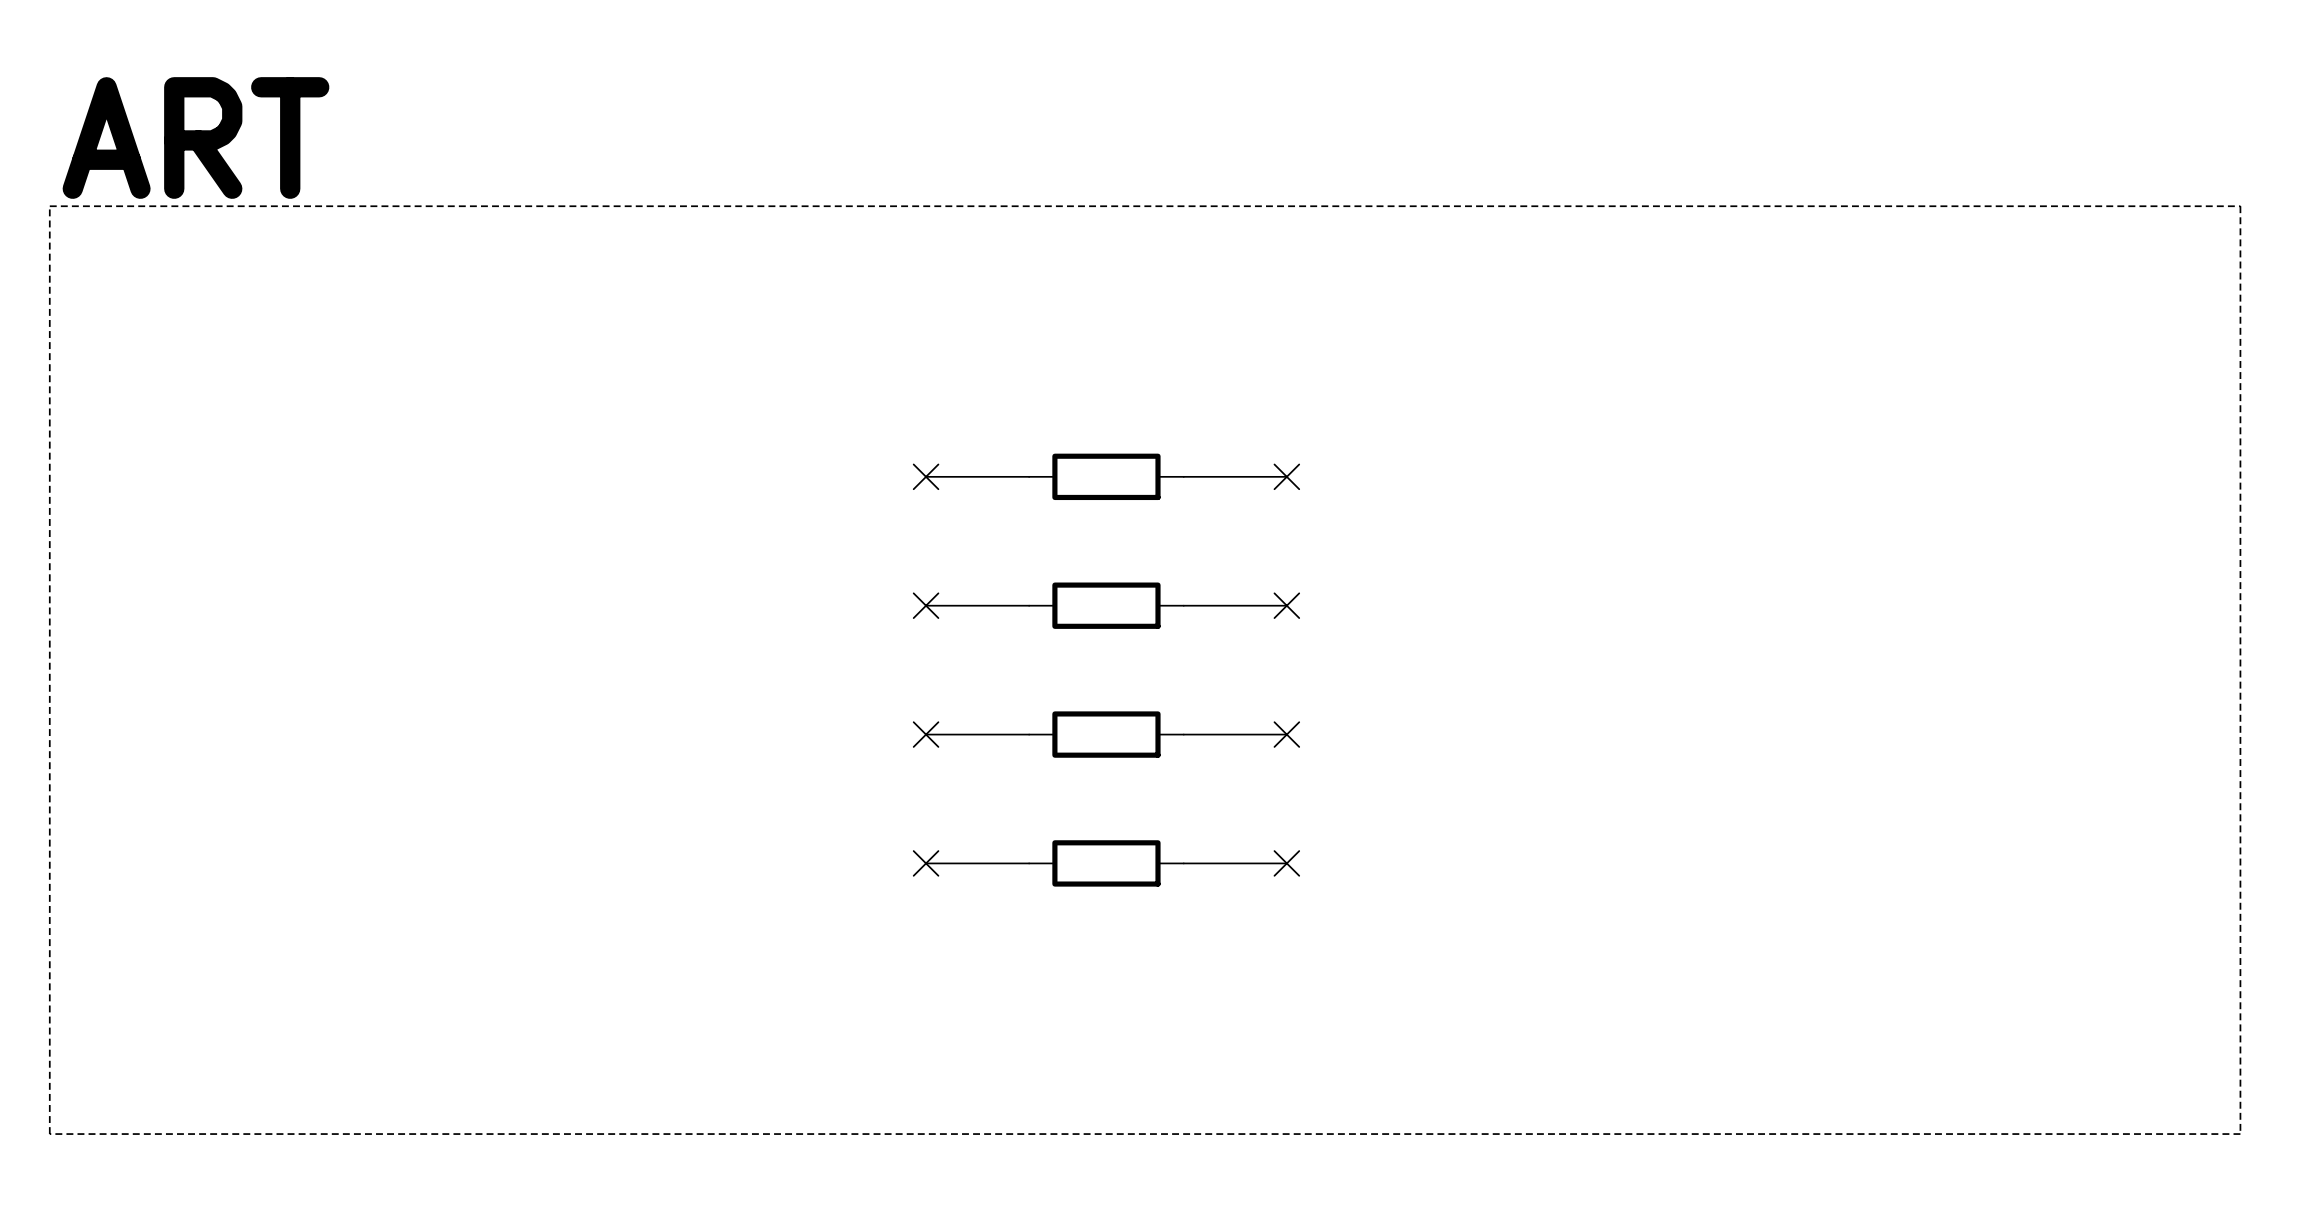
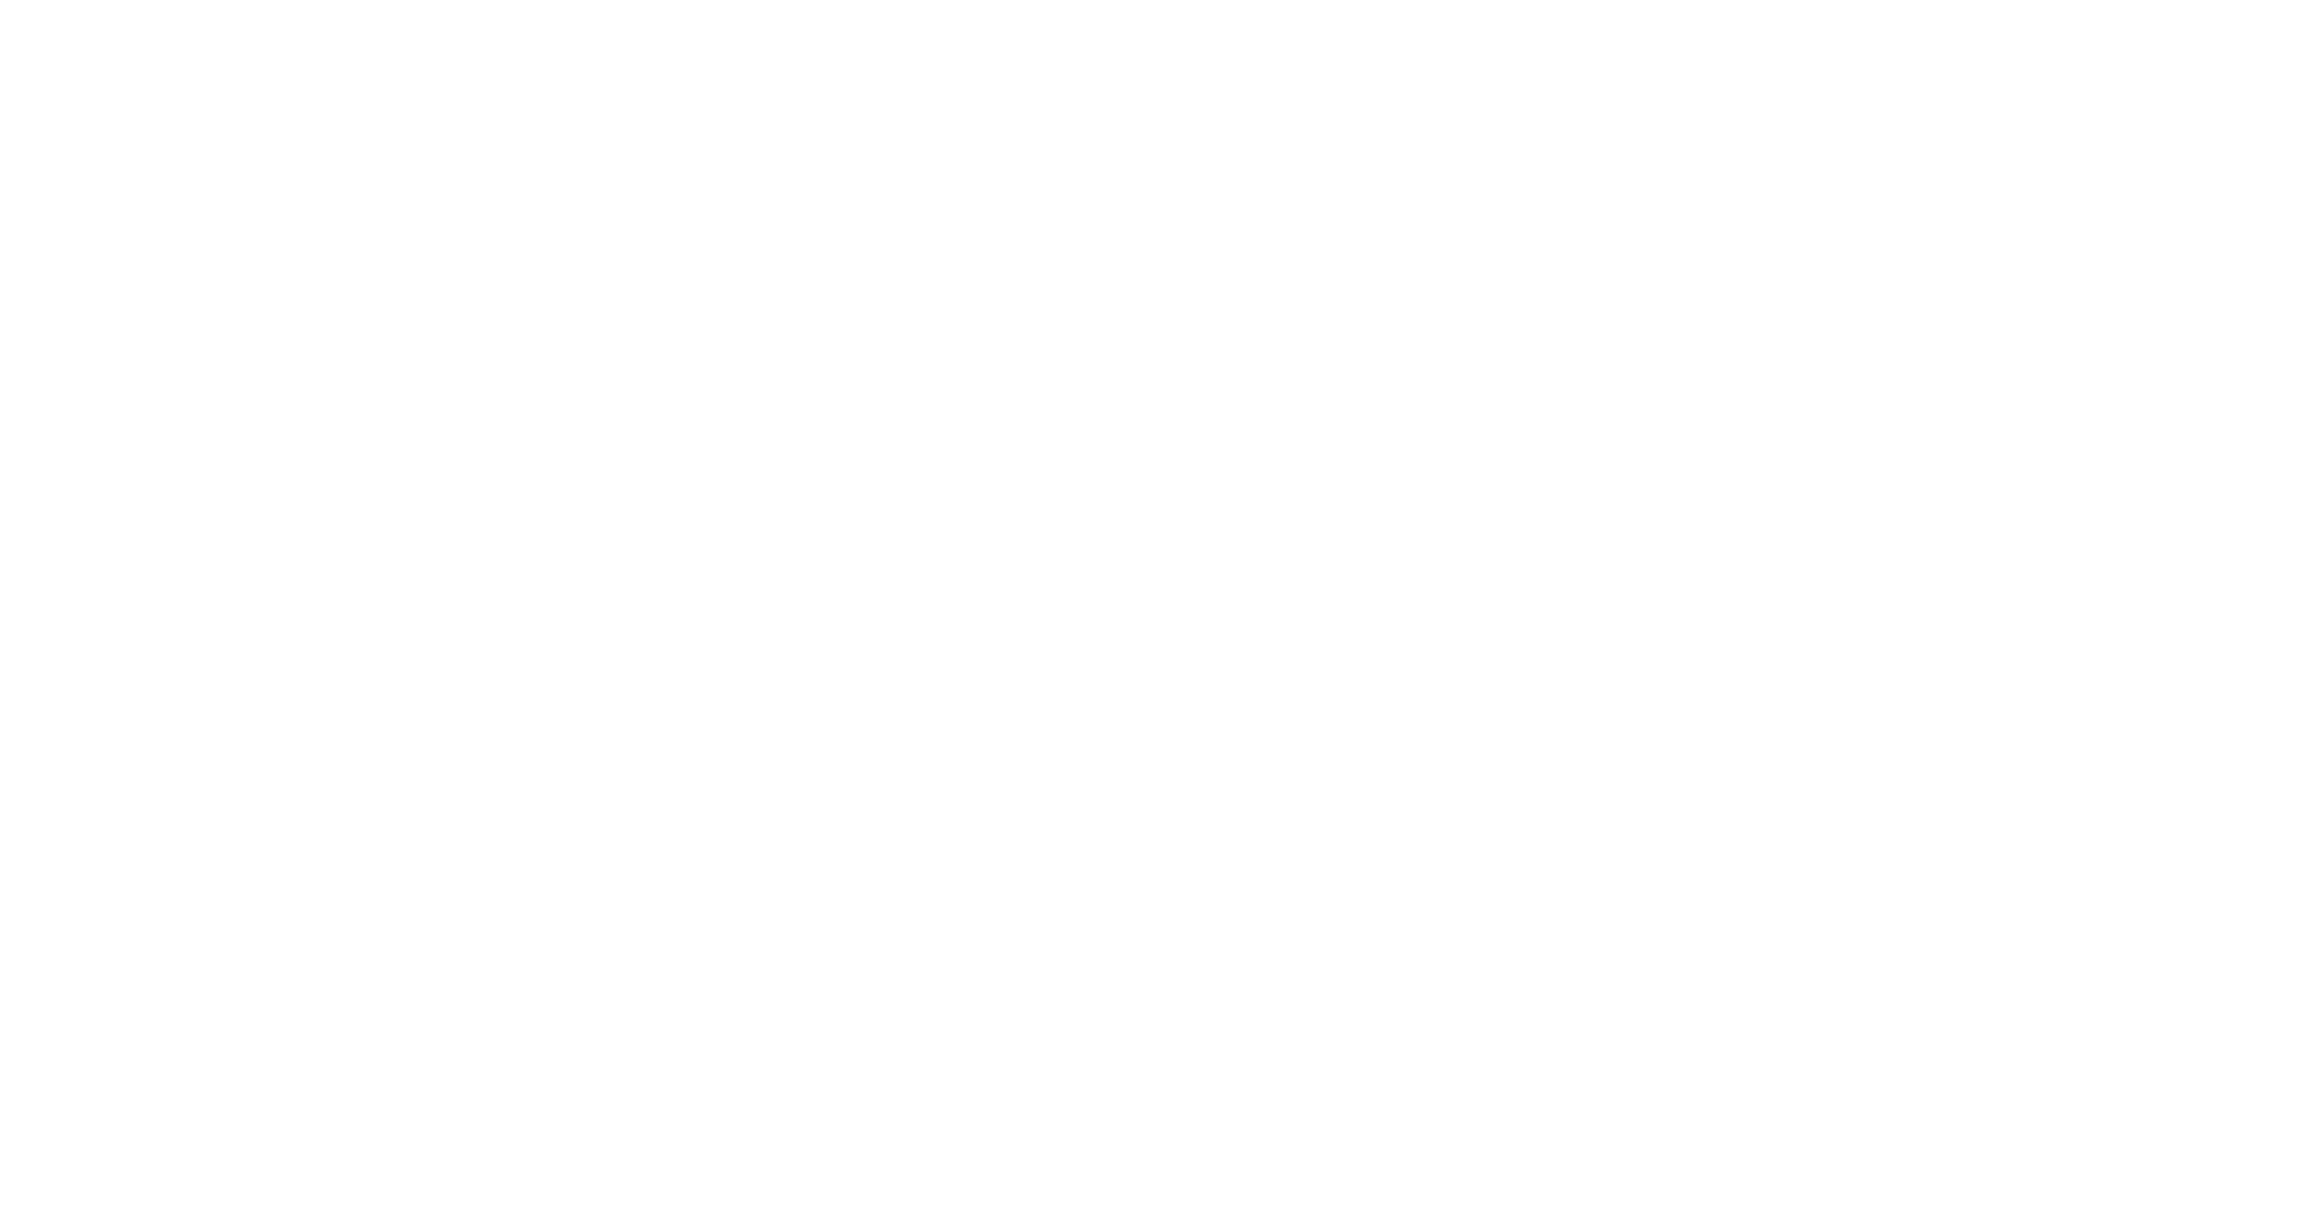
text: ART (196, 138) -> none
line: (49, 206) (2240, 206) (2240, 1134) (49, 1134) (49, 206) -> none
wire: (926, 476) (1029, 476) -> none
no-connect mark: (926, 476) -> none
part: (1106, 476) -> none
wire: (1183, 476) (1286, 476) -> none
no-connect mark: (1286, 476) -> none
wire: (926, 605) (1029, 605) -> none
no-connect mark: (926, 605) -> none
part: (1106, 605) -> none
wire: (1183, 605) (1286, 605) -> none
no-connect mark: (1286, 605) -> none
wire: (926, 734) (1029, 734) -> none
no-connect mark: (926, 734) -> none
part: (1106, 734) -> none
wire: (1183, 734) (1286, 734) -> none
no-connect mark: (1286, 734) -> none
wire: (926, 863) (1029, 863) -> none
no-connect mark: (926, 863) -> none
part: (1106, 863) -> none
wire: (1183, 863) (1286, 863) -> none
no-connect mark: (1286, 863) -> none

